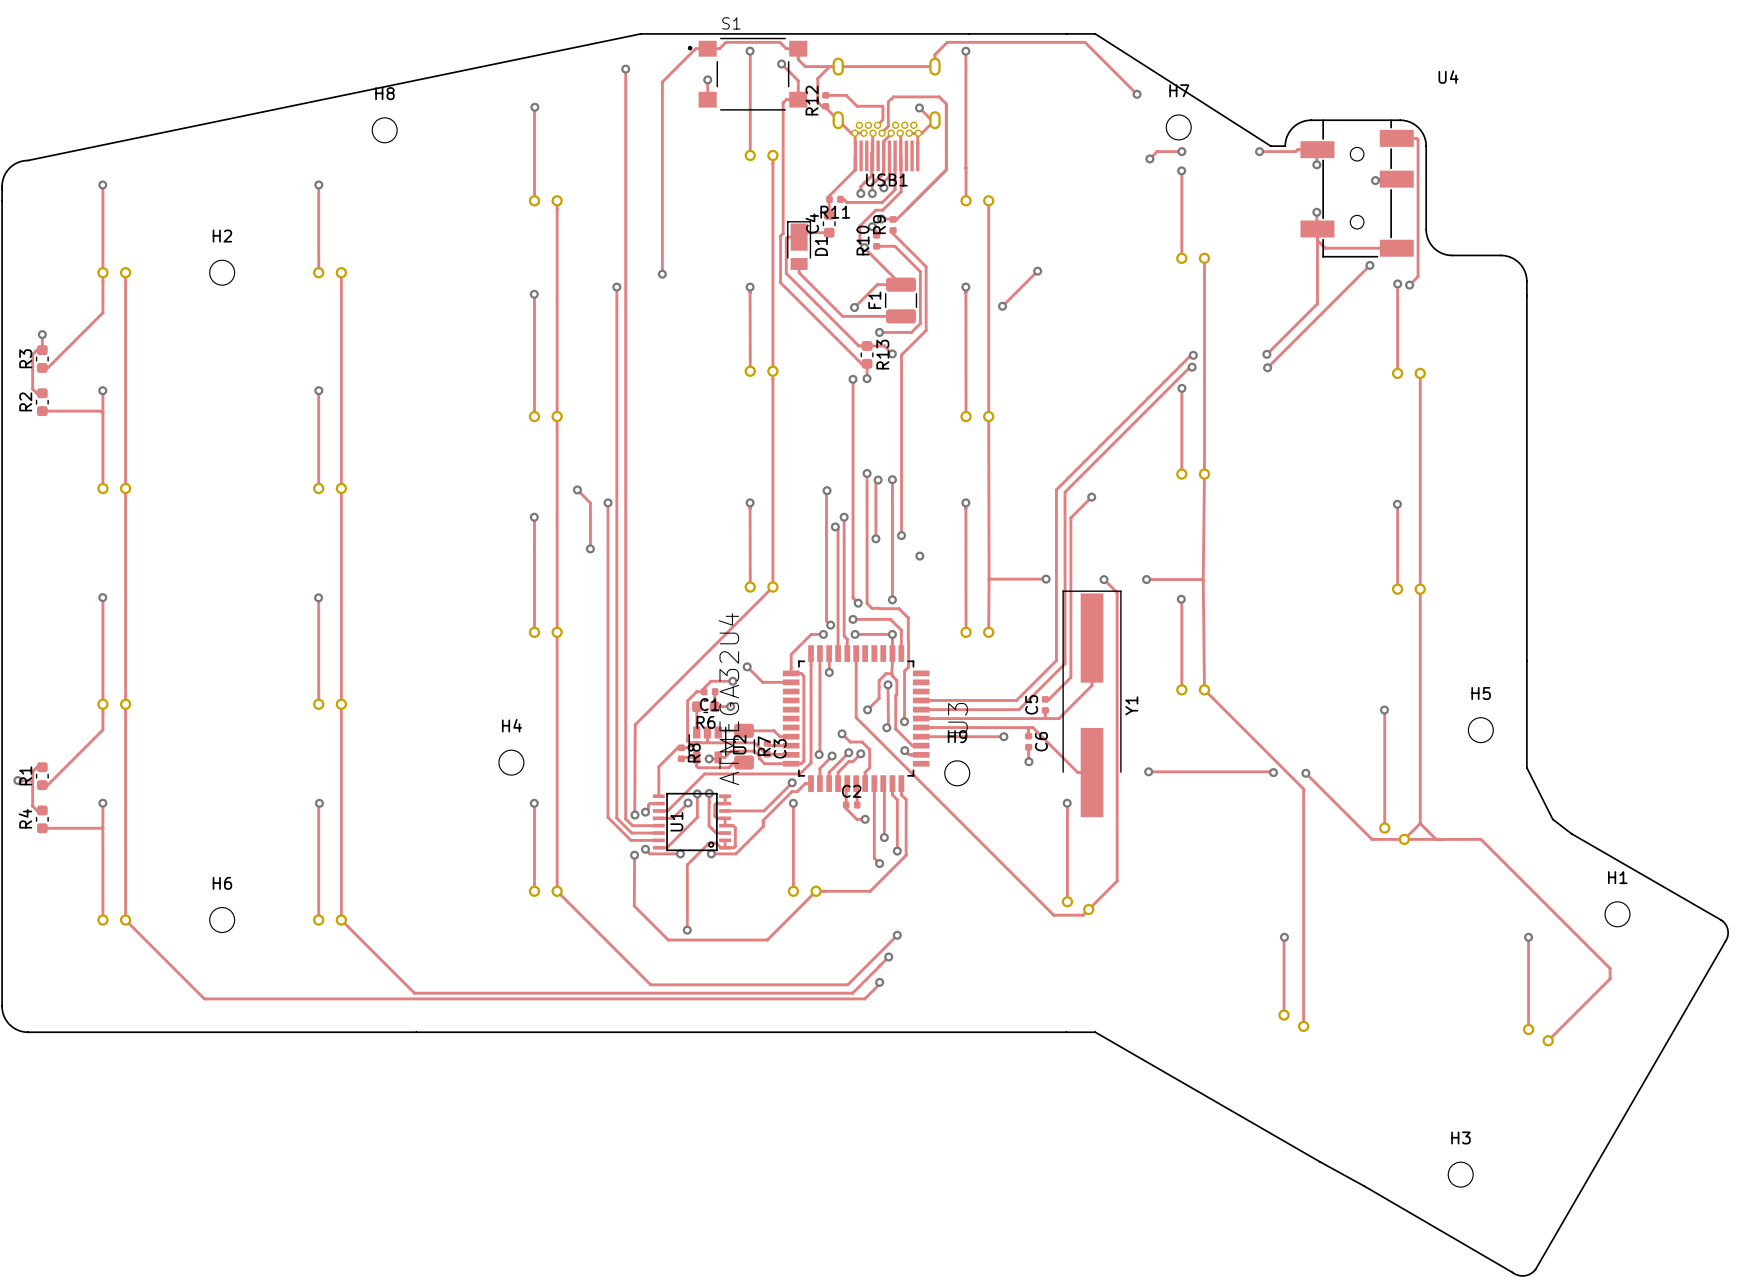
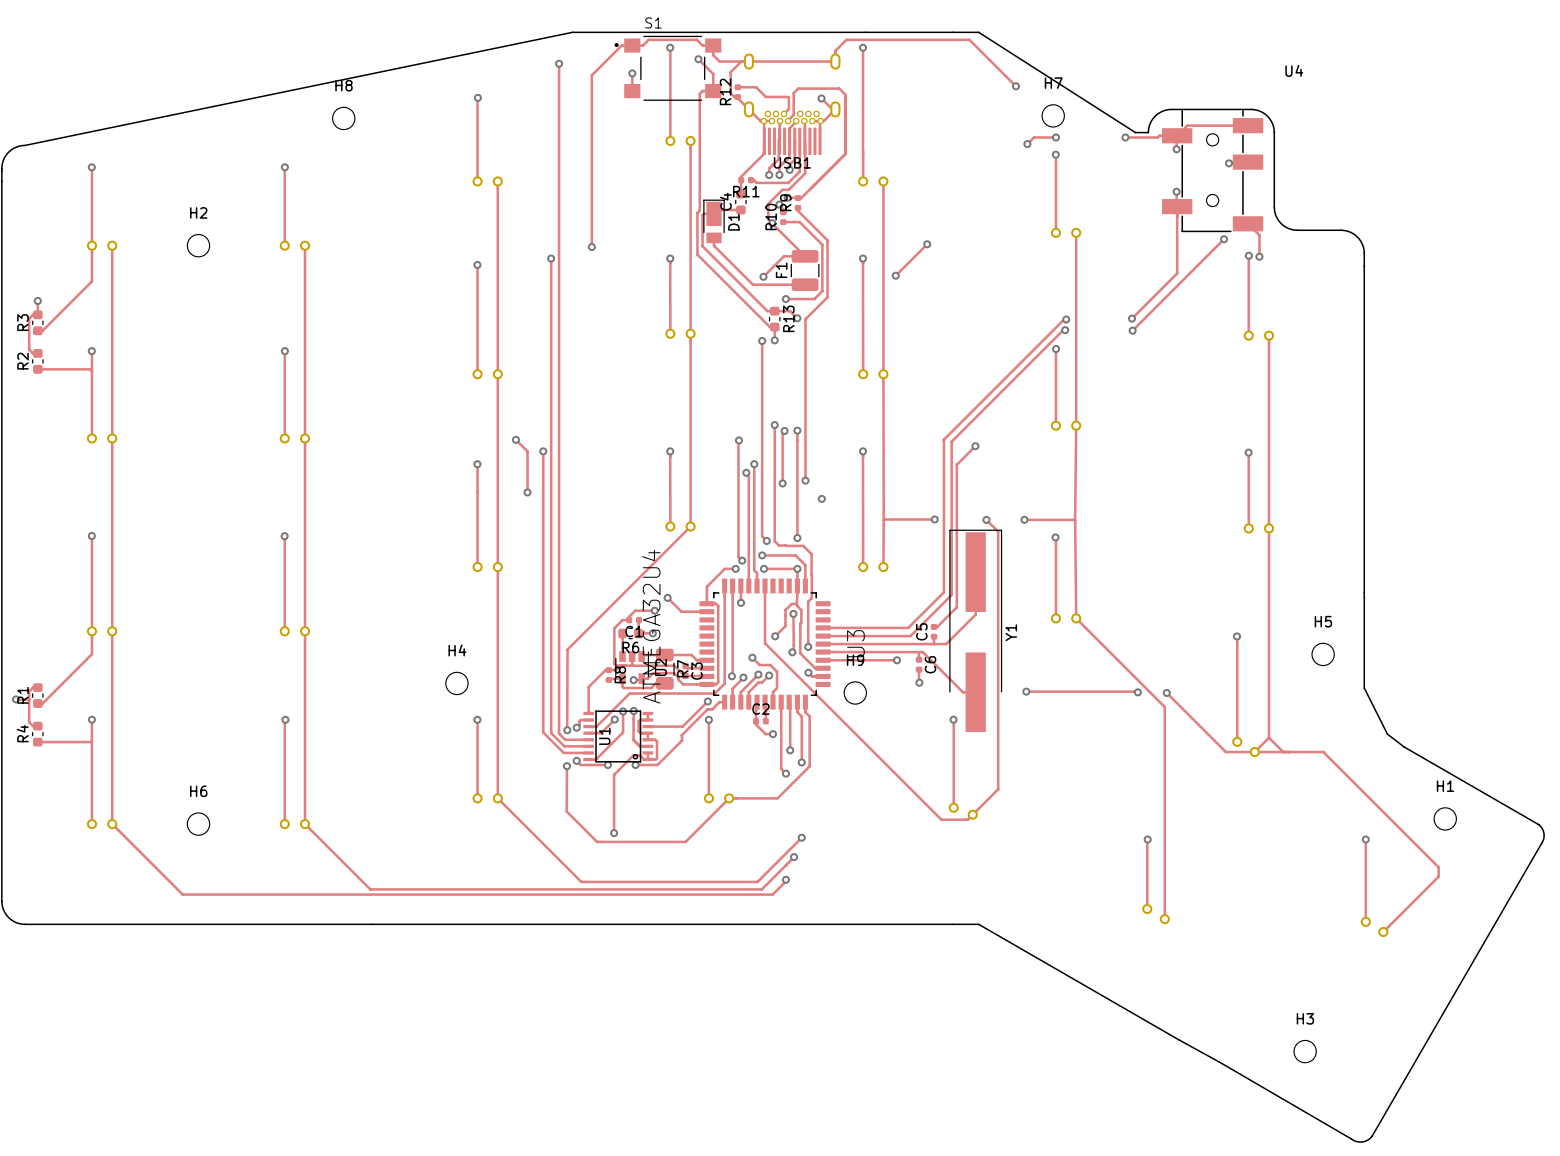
track: (1396, 138) (1418, 139) (1418, 276) (1409, 285) -> (1248, 125) (1187, 125) (1177, 135)
track: (1317, 240) (1325, 248) (1396, 248) -> (1259, 256) (1259, 235) (1248, 223)

